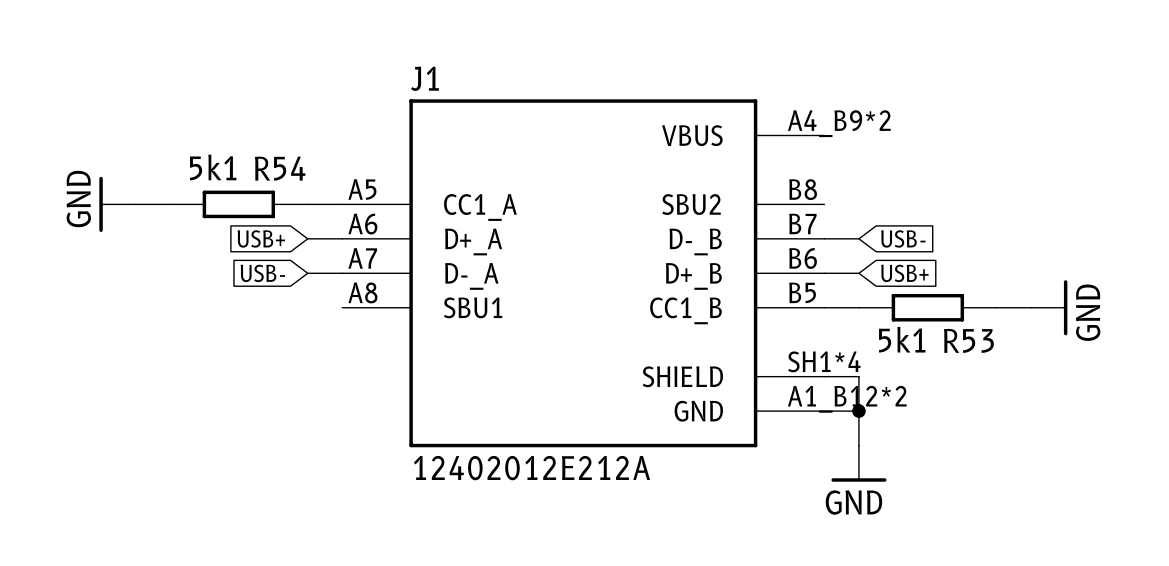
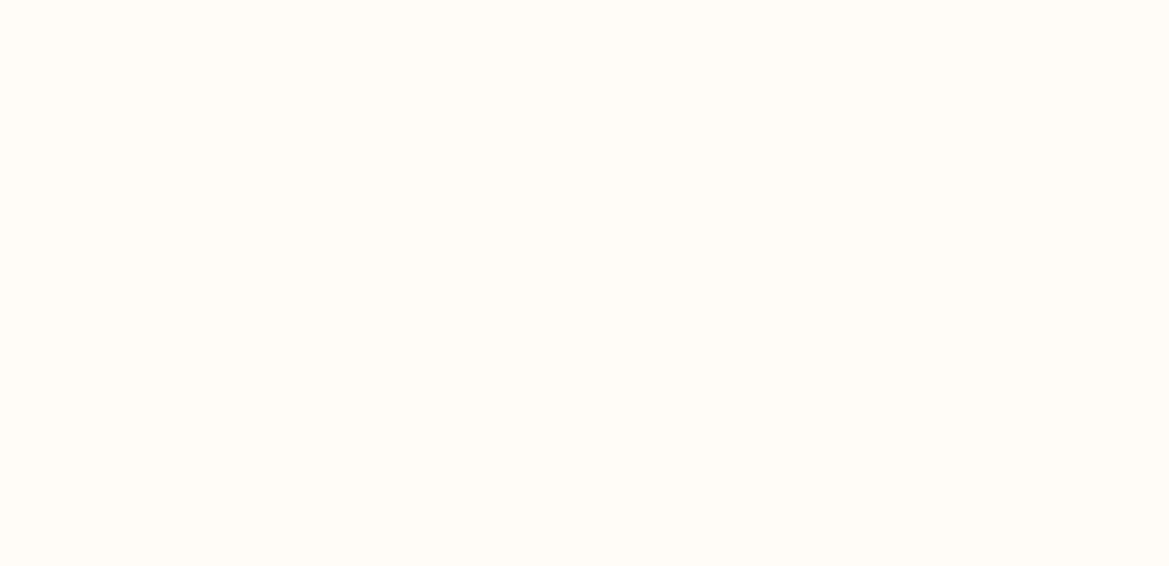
power symbol: GND (117, 204) -> none
wire: (135, 204) (169, 204) -> none
R54: 5k1 (238, 204) -> none
wire: (307, 204) (342, 204) -> none
global label: USB+ (261, 238) -> none
wire: (307, 238) (342, 238) -> none
wire: (824, 238) (858, 238) -> none
global label: USB- (903, 238) -> none
global label: USB- (262, 273) -> none
wire: (307, 273) (342, 273) -> none
J1: 12402012E212A (583, 273) -> none
wire: (824, 273) (858, 273) -> none
global label: USB+ (904, 273) -> none
wire: (824, 307) (858, 307) -> none
R53: 5k1 (927, 307) -> none
wire: (996, 307) (1031, 307) -> none
power symbol: GND (1049, 307) -> none
wire: (824, 376) (858, 376) (858, 445) -> none
wire: (824, 411) (858, 411) -> none
junction: (858, 411) -> none
power symbol: GND (858, 463) -> none

